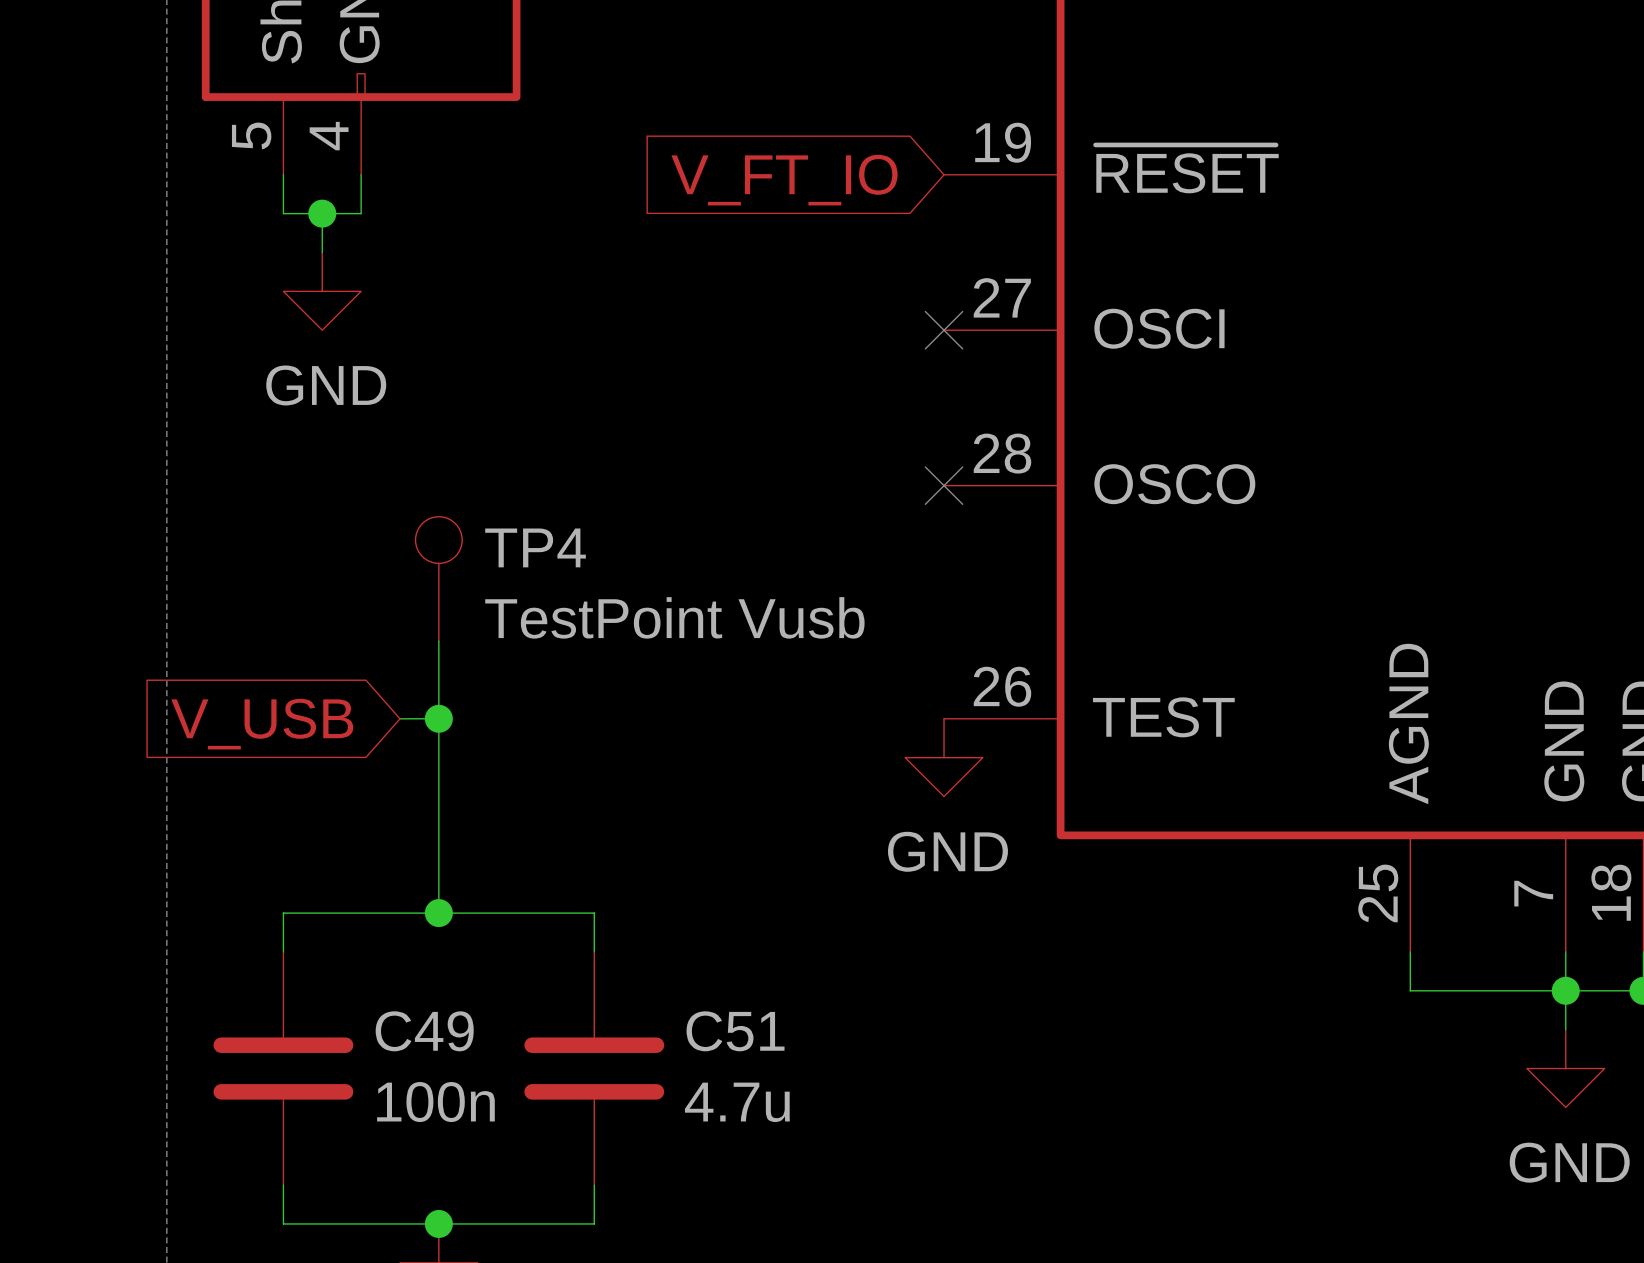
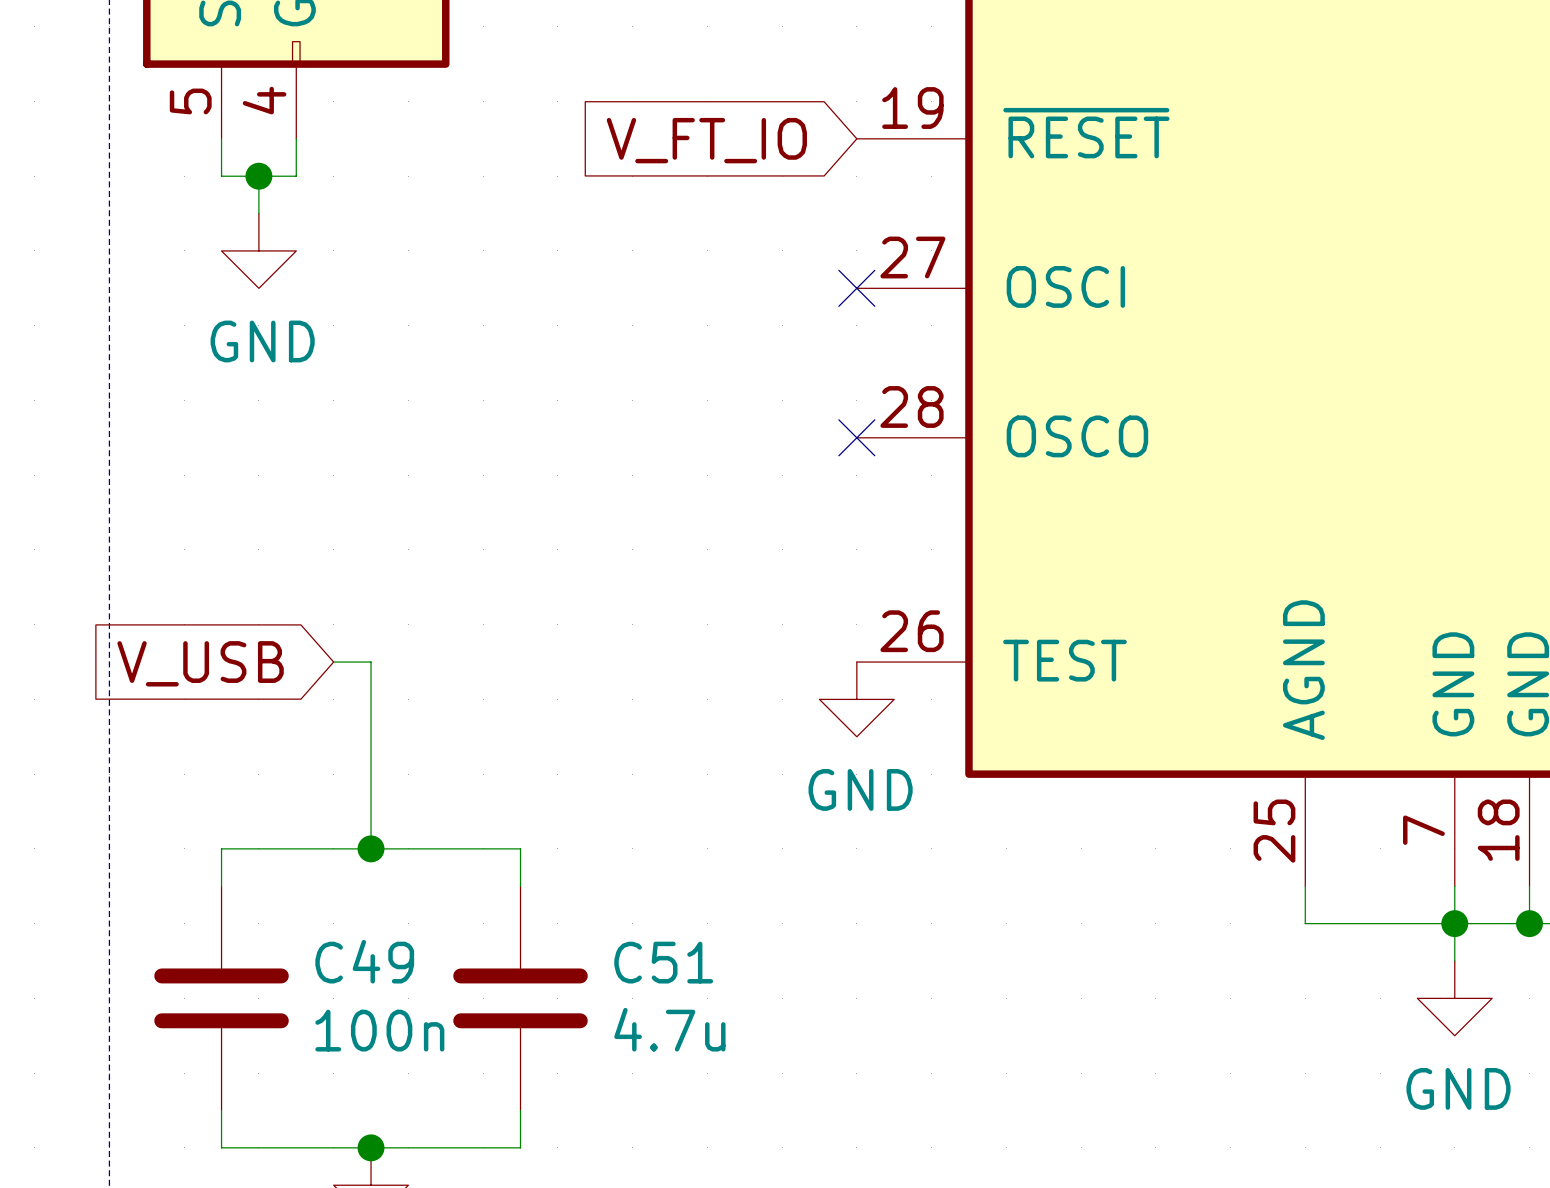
TP4: TestPoint Vusb (438, 578) -> none
wire: (438, 641) (438, 718) -> none
junction: (438, 718) -> none

